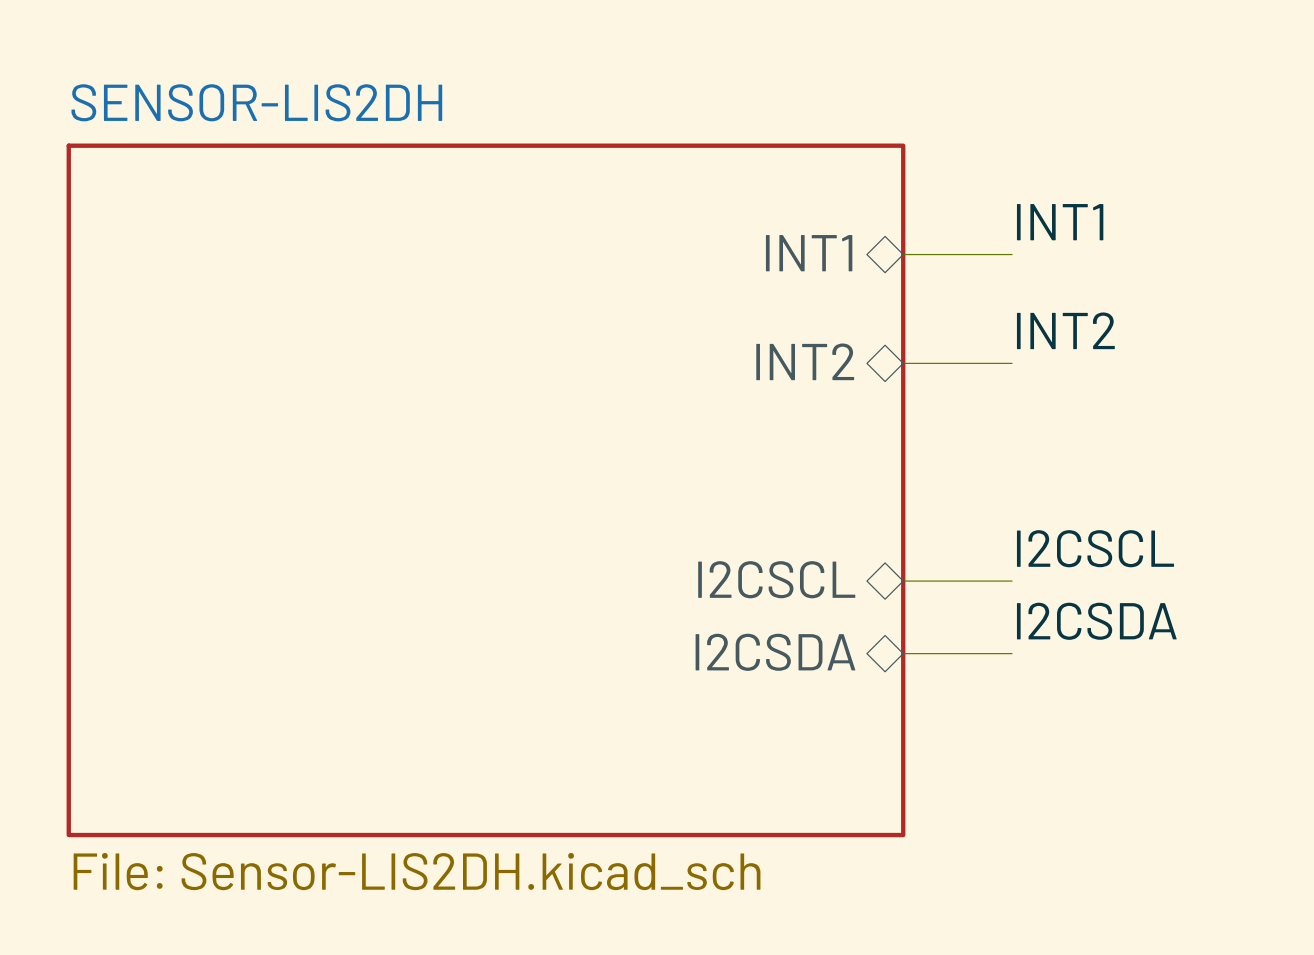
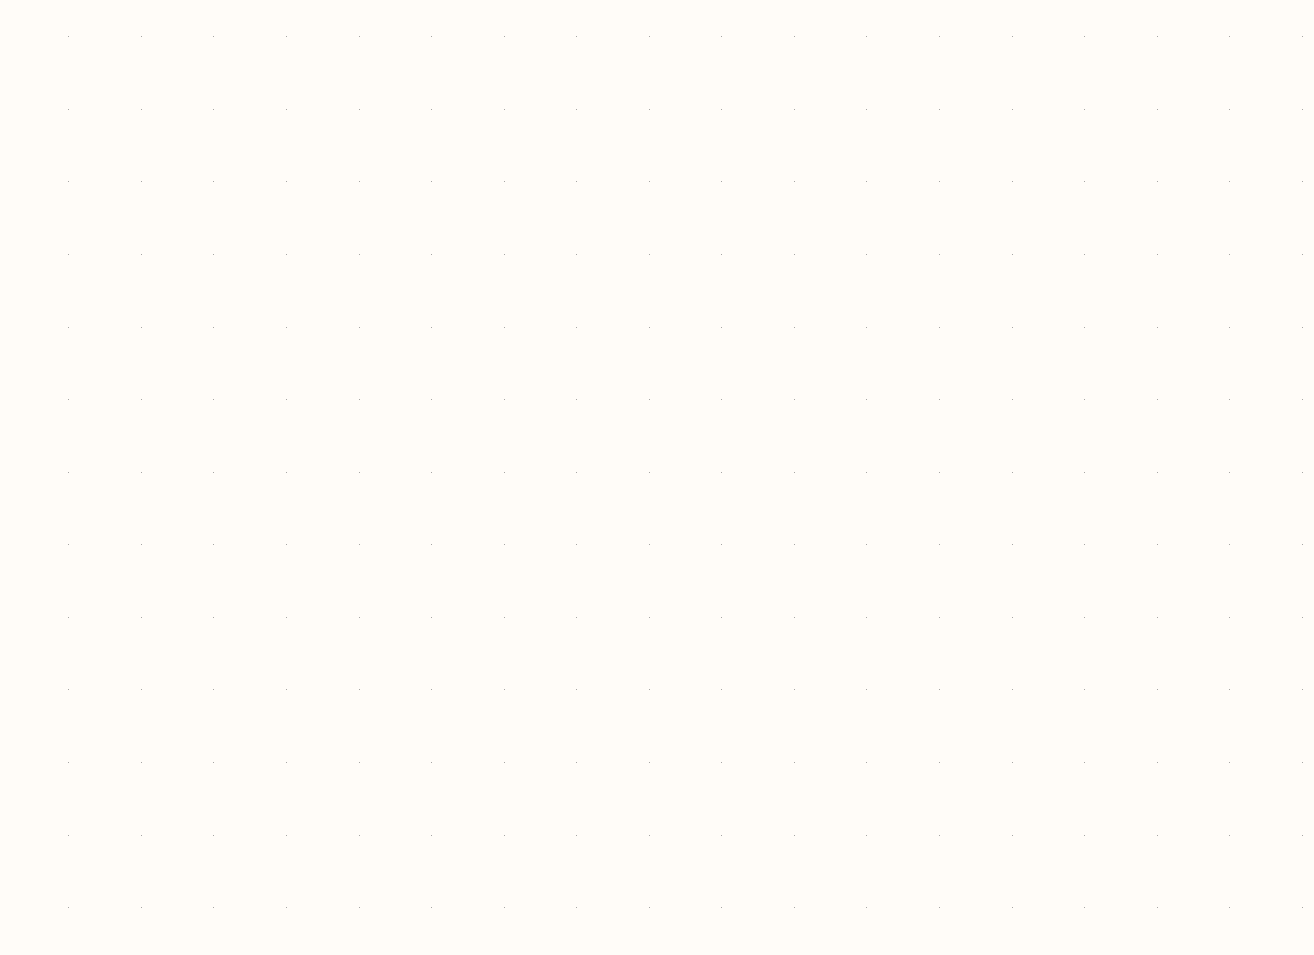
label: INT1 (1060, 222) -> none
sheet pin: INT1 (809, 253) -> none
wire: (903, 254) (1012, 254) -> none
label: INT2 (1065, 330) -> none
sheet pin: INT2 (805, 361) -> none
wire: (903, 363) (1012, 363) -> none
sheet SENSOR-LIS2DH: File: Sensor-LIS2DH.kicad_sch (486, 490) -> none
label: I2CSCL (1095, 548) -> none
sheet pin: I2CSCL (776, 579) -> none
wire: (903, 581) (1012, 581) -> none
label: I2CSDA (1096, 621) -> none
sheet pin: I2CSDA (775, 652) -> none
wire: (903, 653) (1012, 653) -> none

